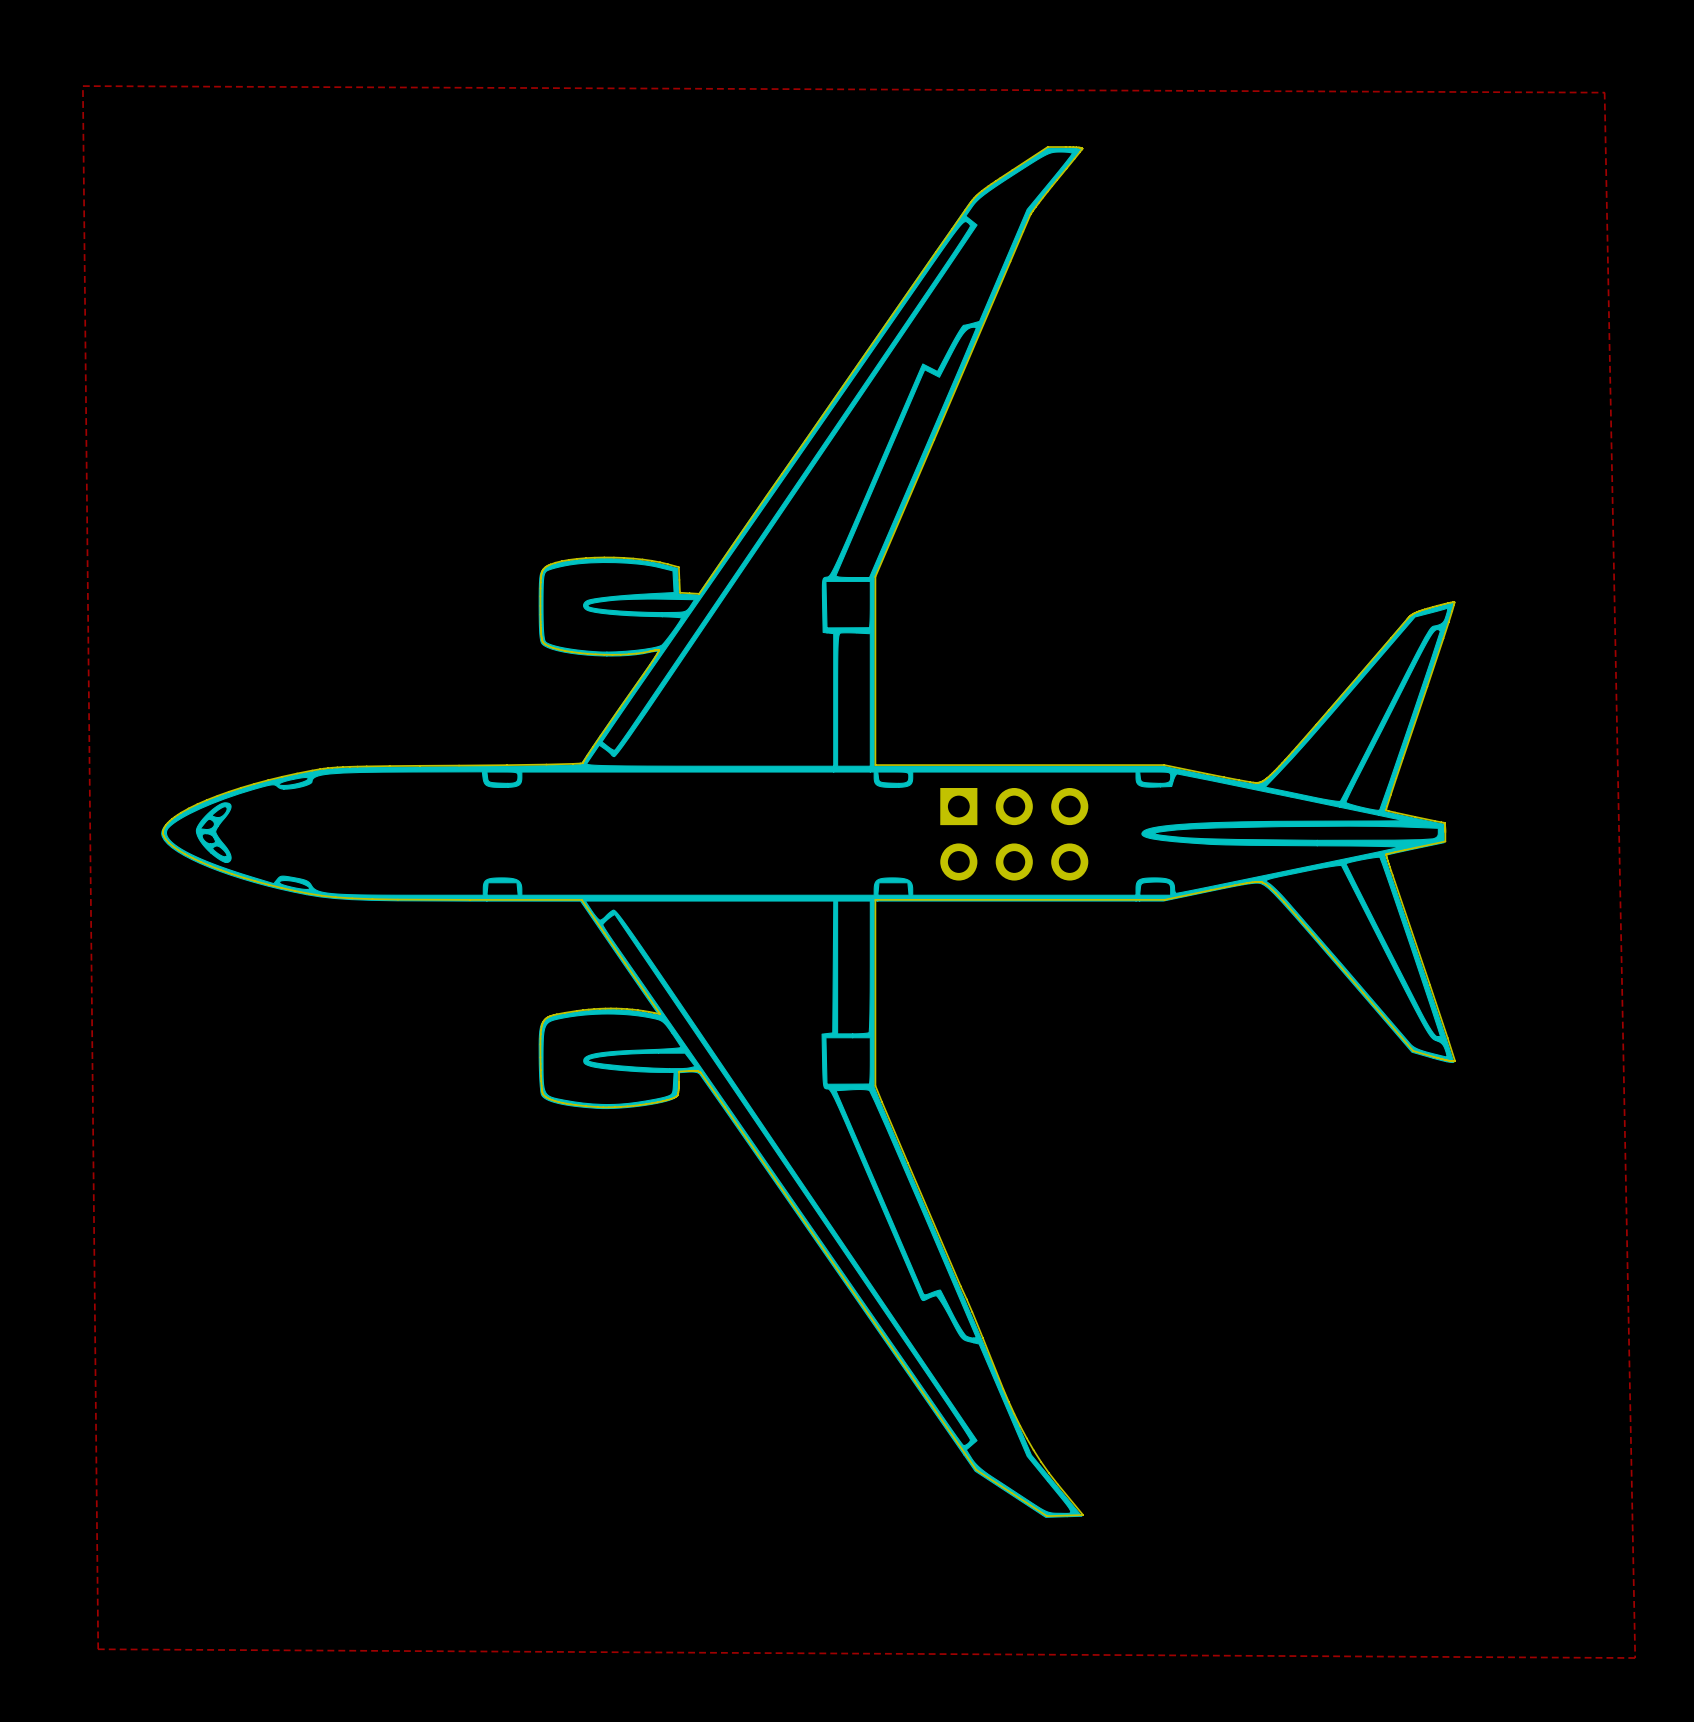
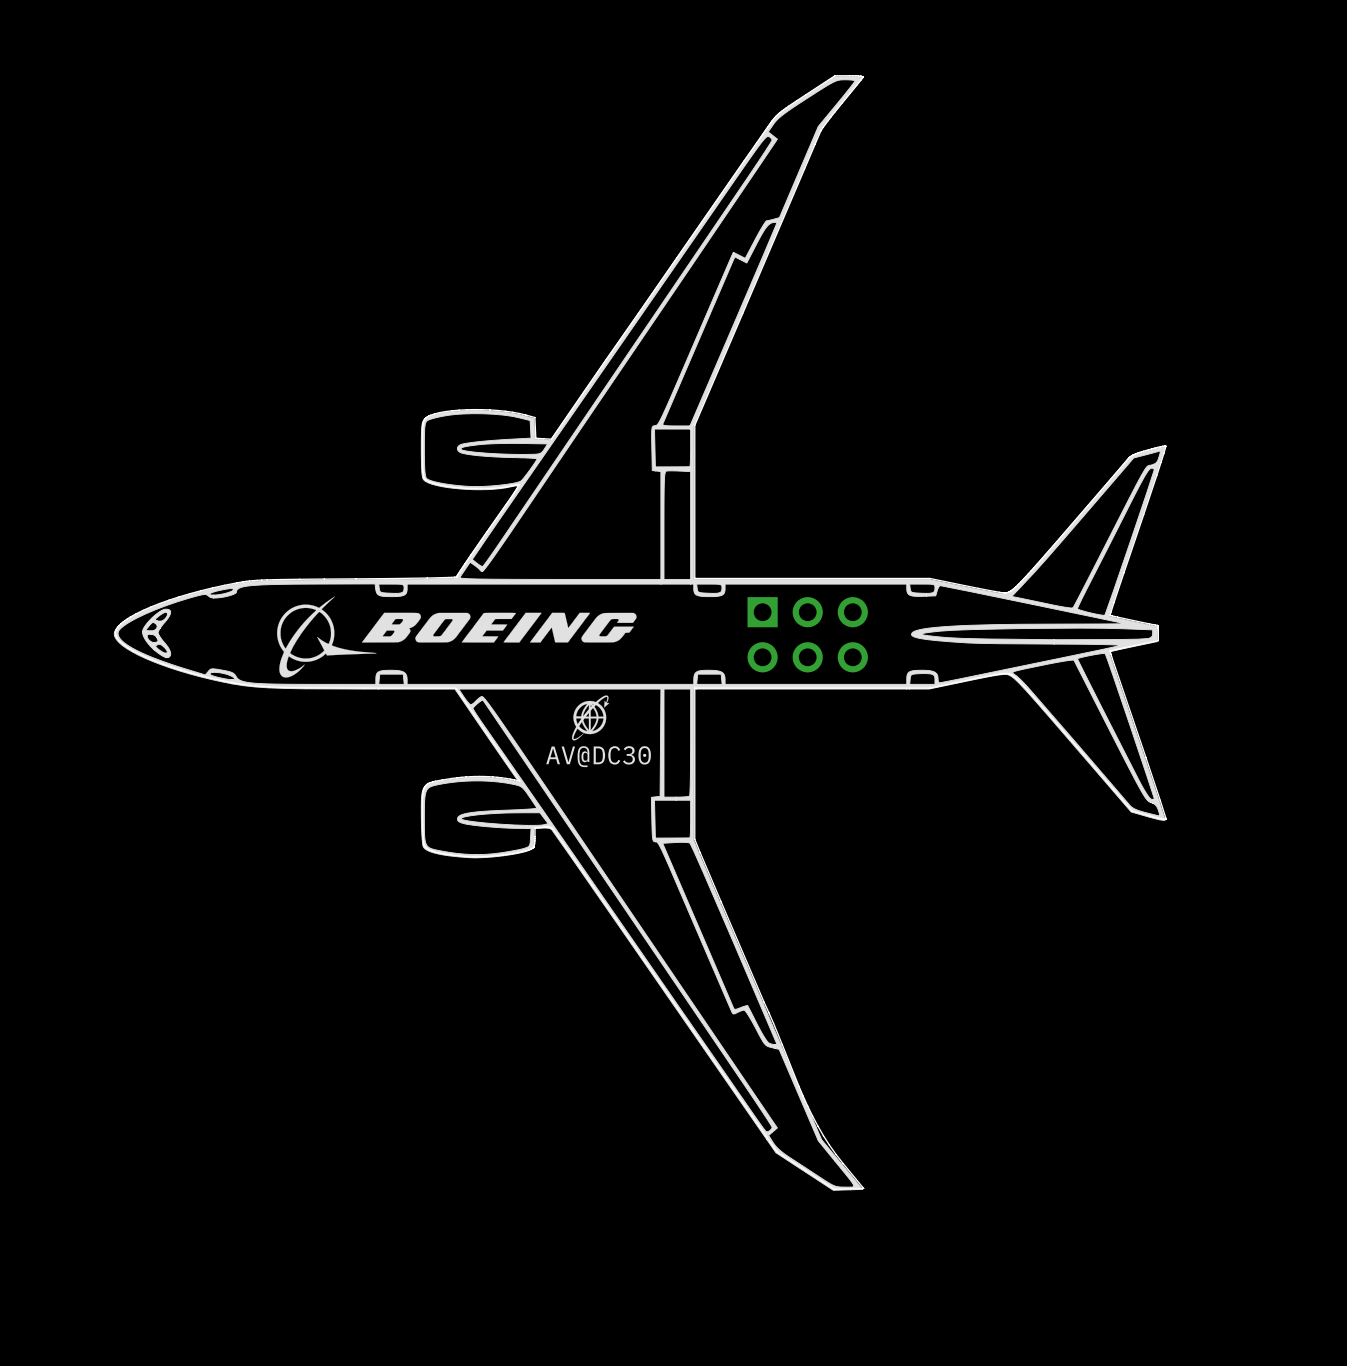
zone outline: (82, 86) (98, 1649) (1635, 1658) (1604, 92) (82, 86) -> none
drawing: none -> [277, 596, 637, 678]
drawing: none -> [571, 695, 610, 741]
text: none -> AV@DC30 (598, 756)

